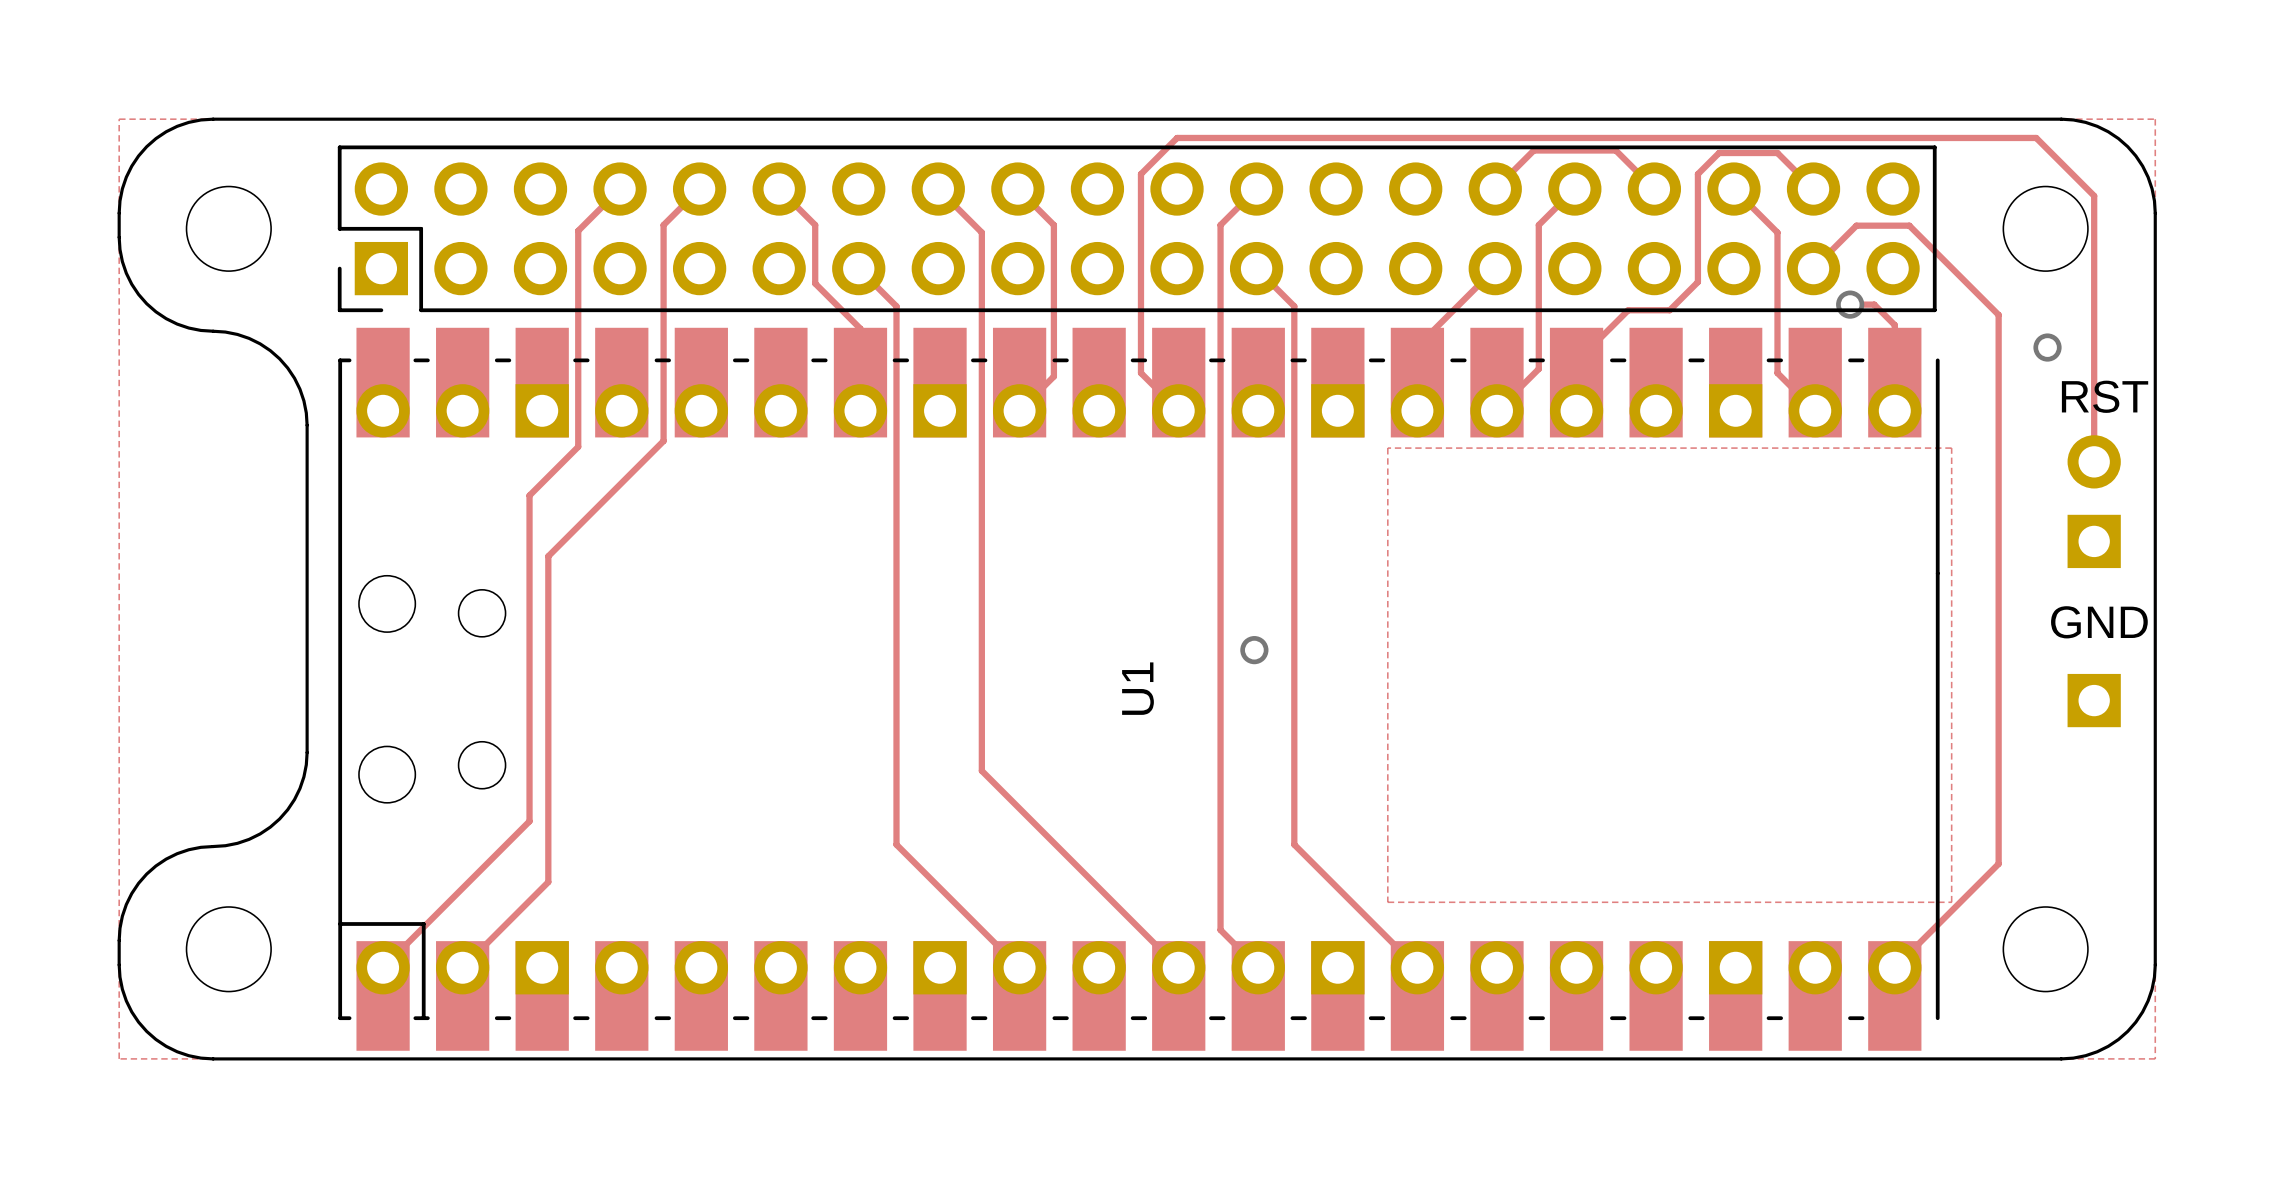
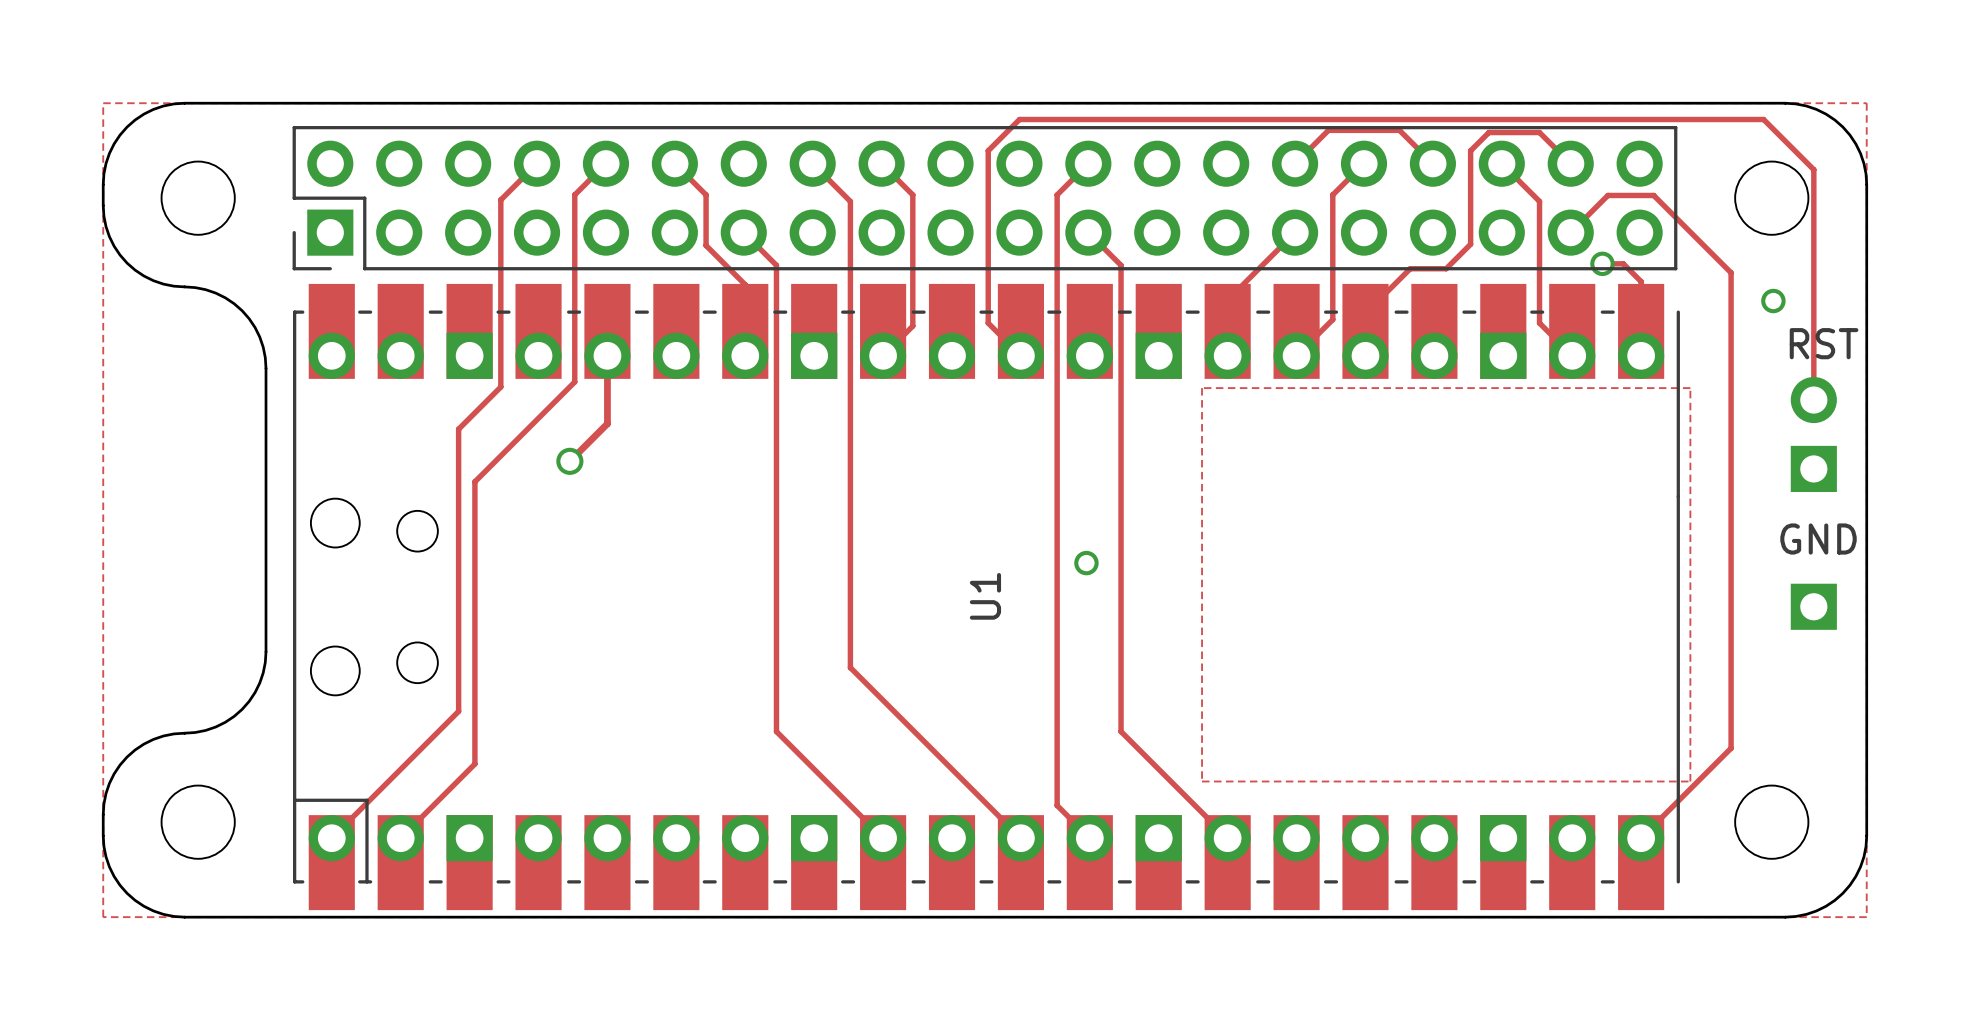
track: none -> (607, 355) (607, 423) (569, 461)
via: none -> (569, 461)

